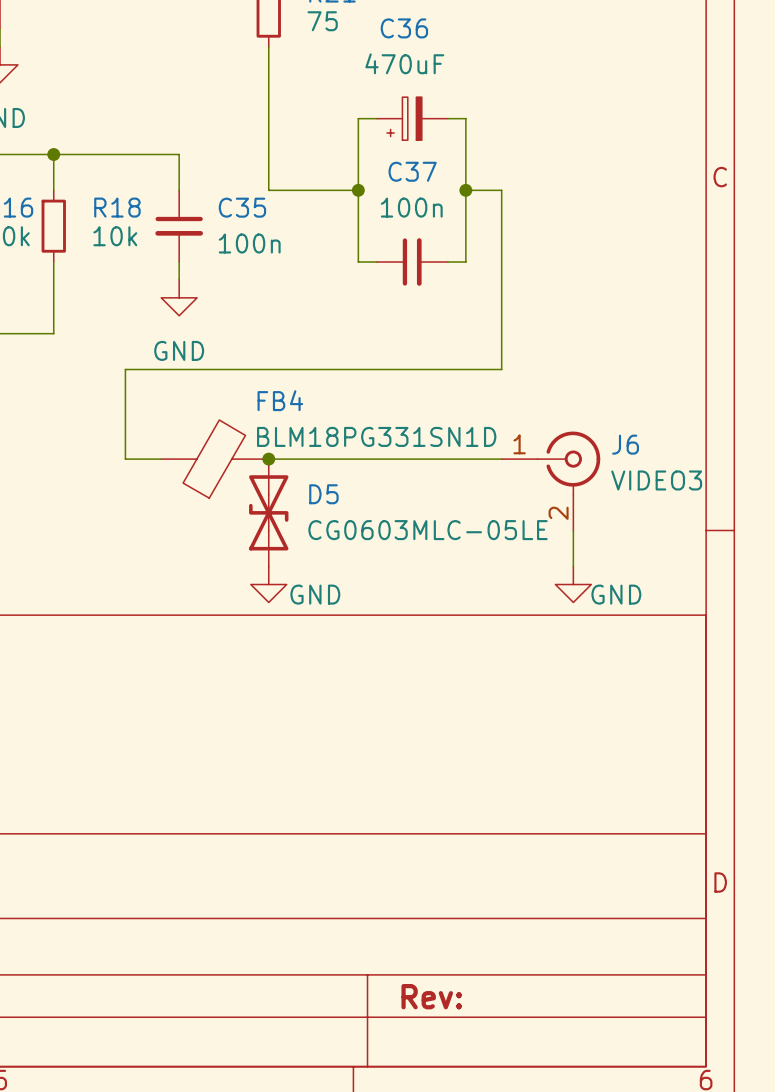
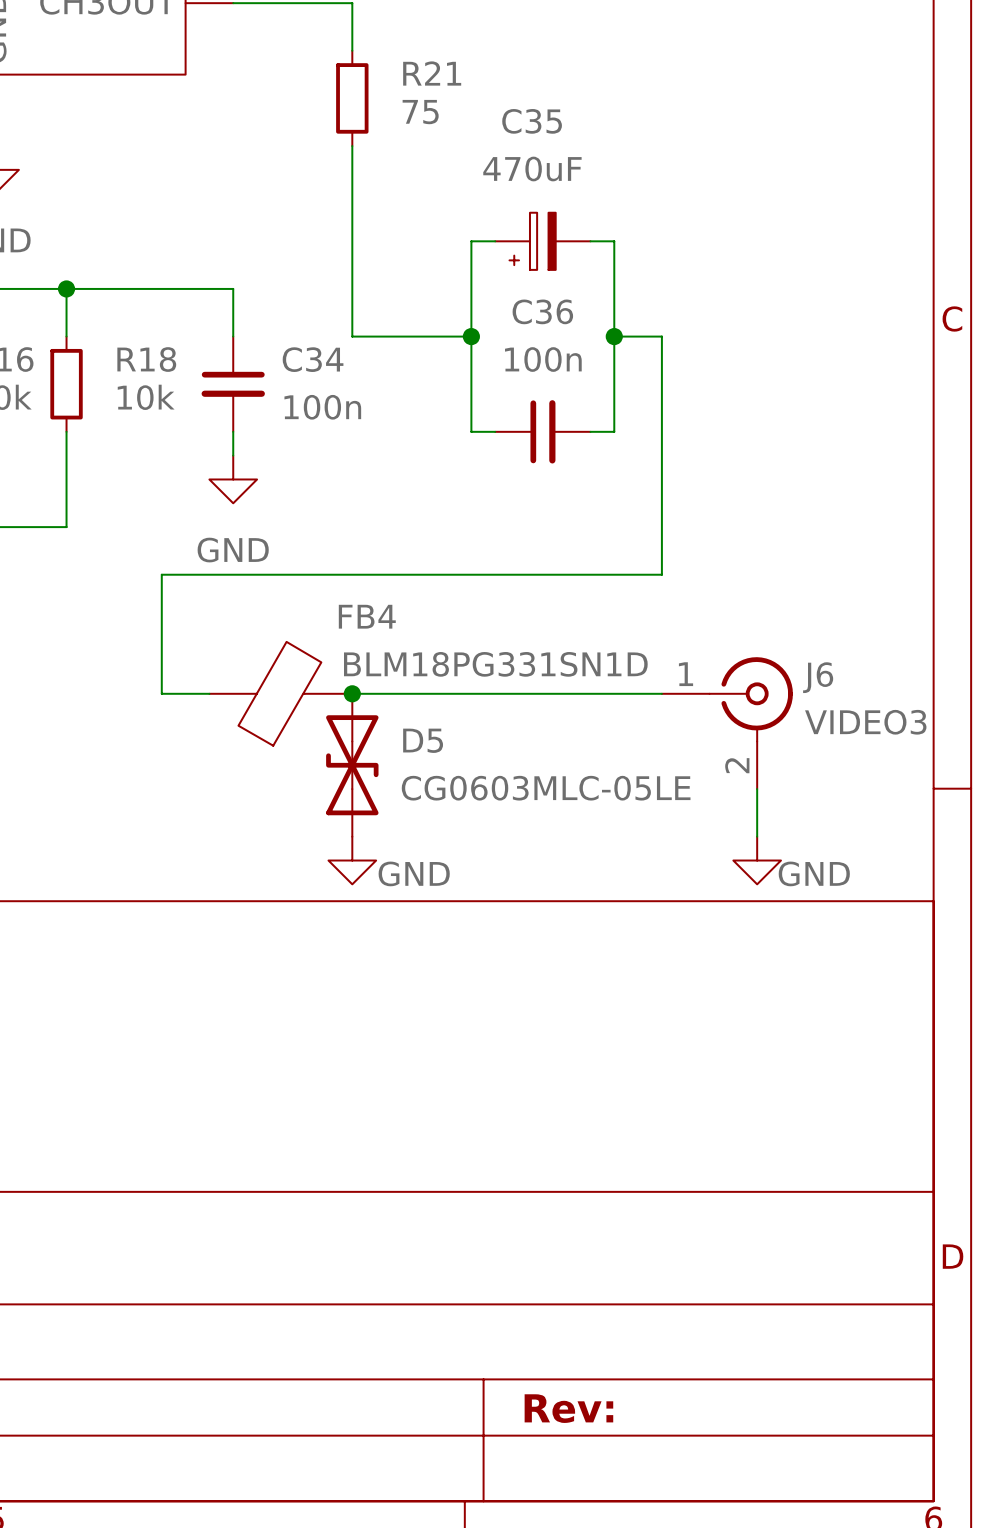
C36 name: C36 (404, 28) -> C35 (532, 121)
C37 name: C37 (412, 171) -> C36 (542, 311)
C35 name: C35 (242, 207) -> C34 (313, 359)

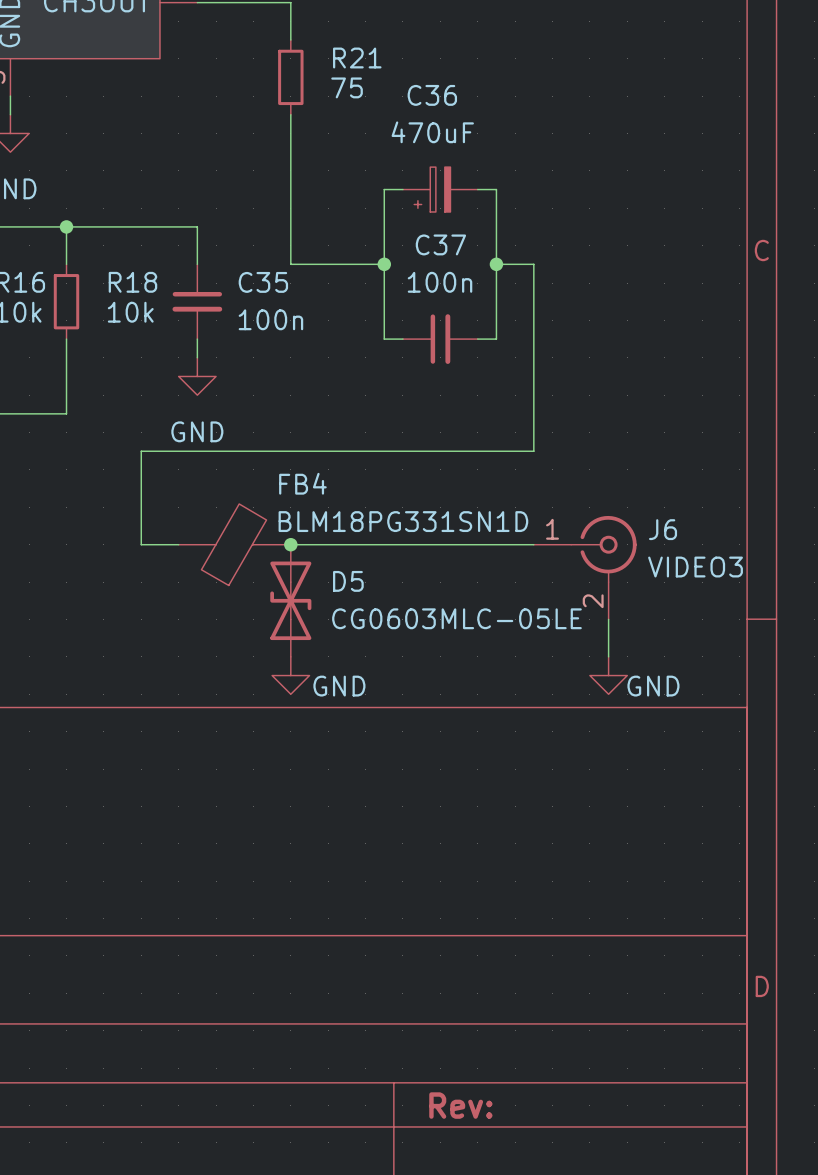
C35 name: C35 (532, 121) -> C36 (432, 95)
C36 name: C36 (542, 311) -> C37 (440, 244)
C34 name: C34 (313, 359) -> C35 (263, 282)

